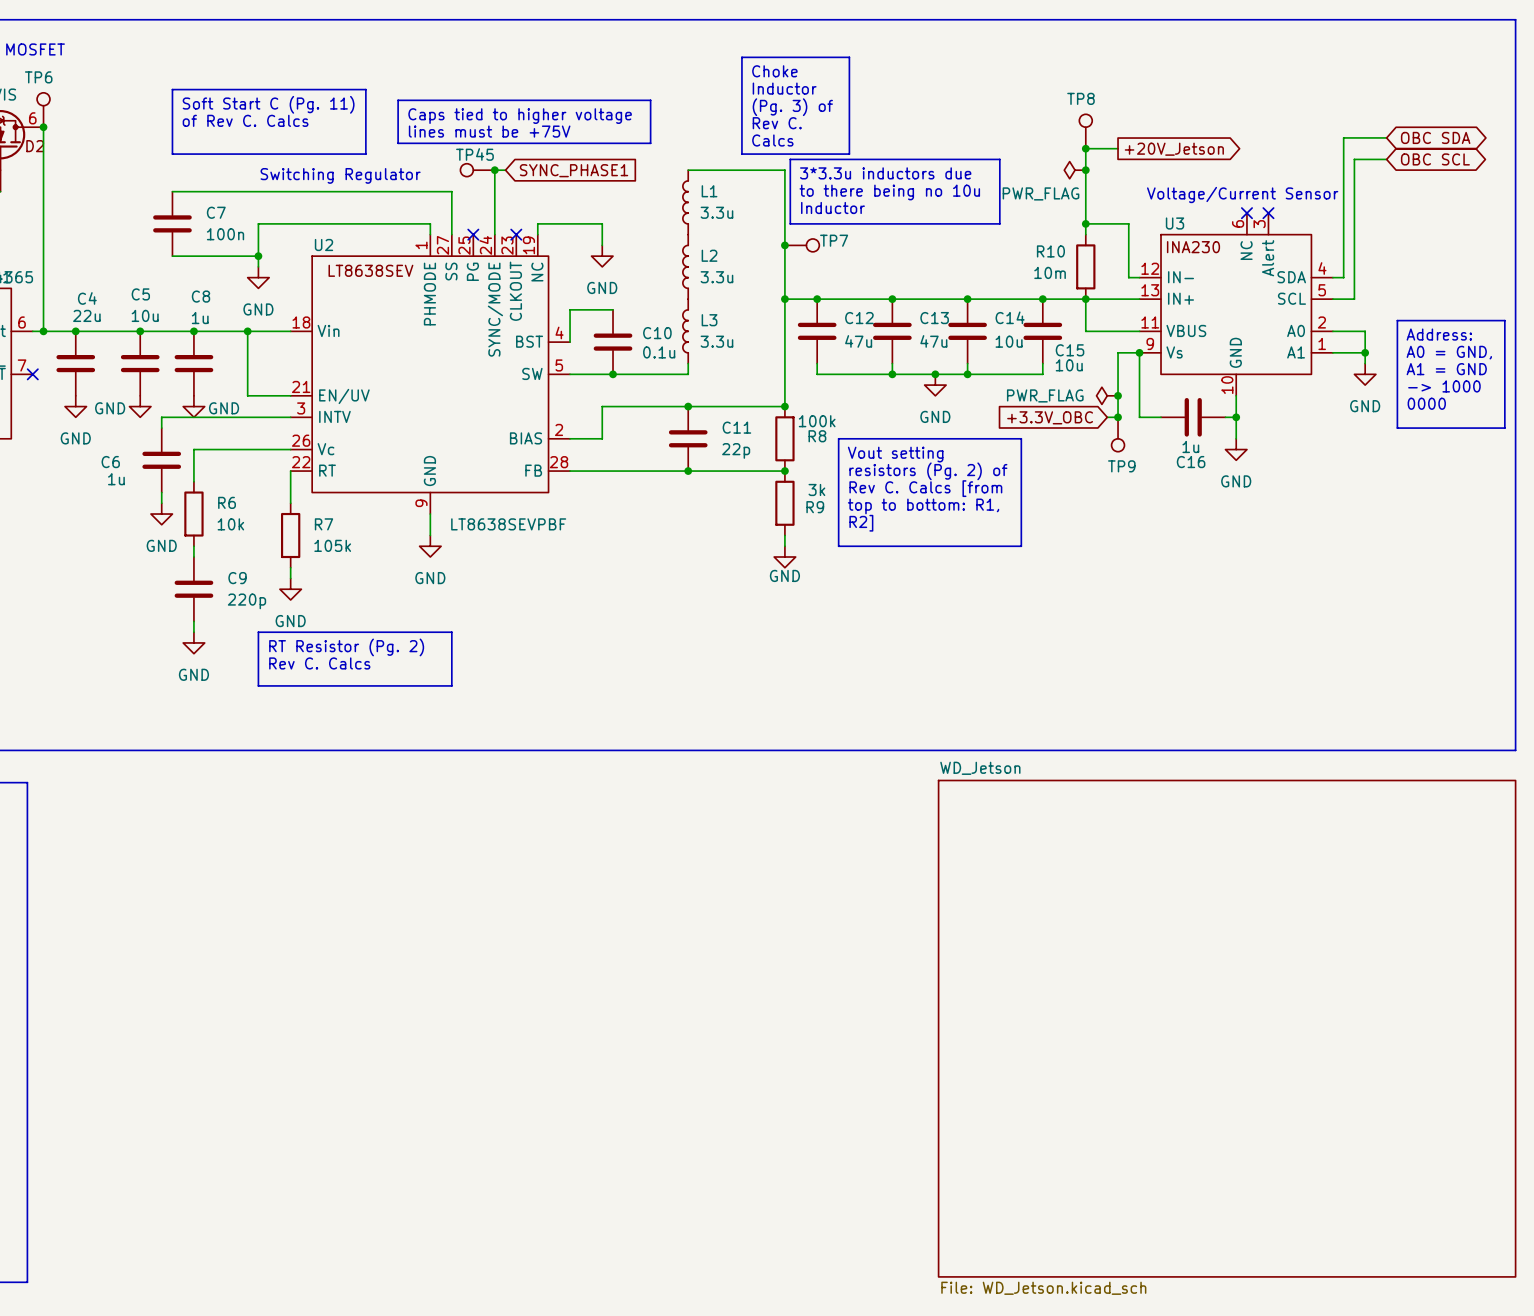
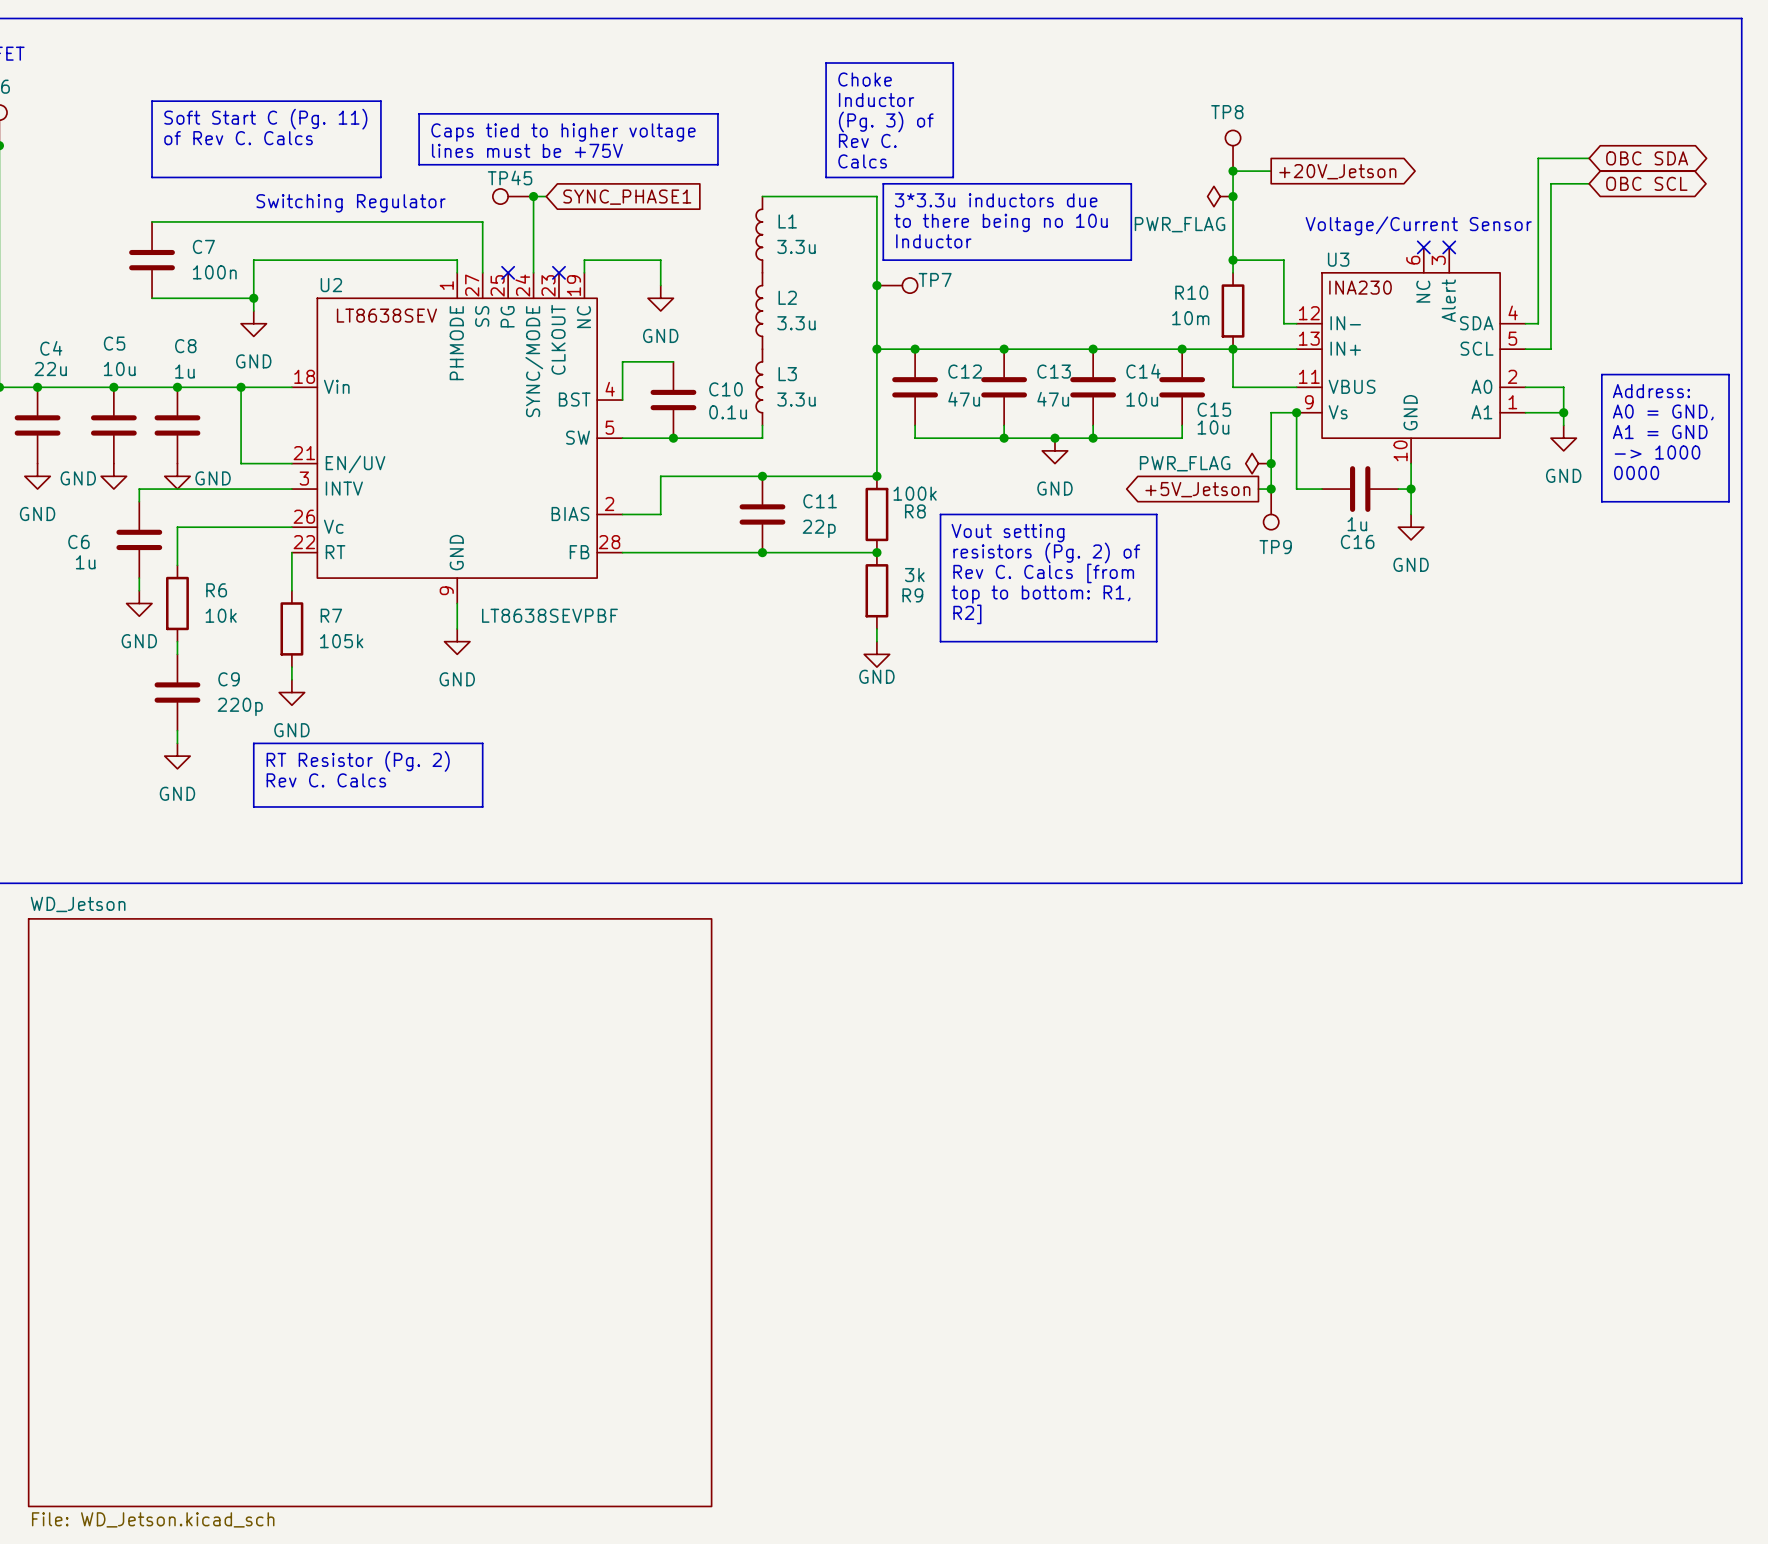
global label shape: input (1050, 417) -> output (1197, 489)
global label: +3.3V_OBC (1050, 417) -> +5V_Jetson (1197, 489)
sheet WD_Jetson: none -> File: WD_Jetson.kicad_sch (370, 1212)
sheet WD_Jetson: File: WD_Jetson.kicad_sch (1227, 1028) -> none

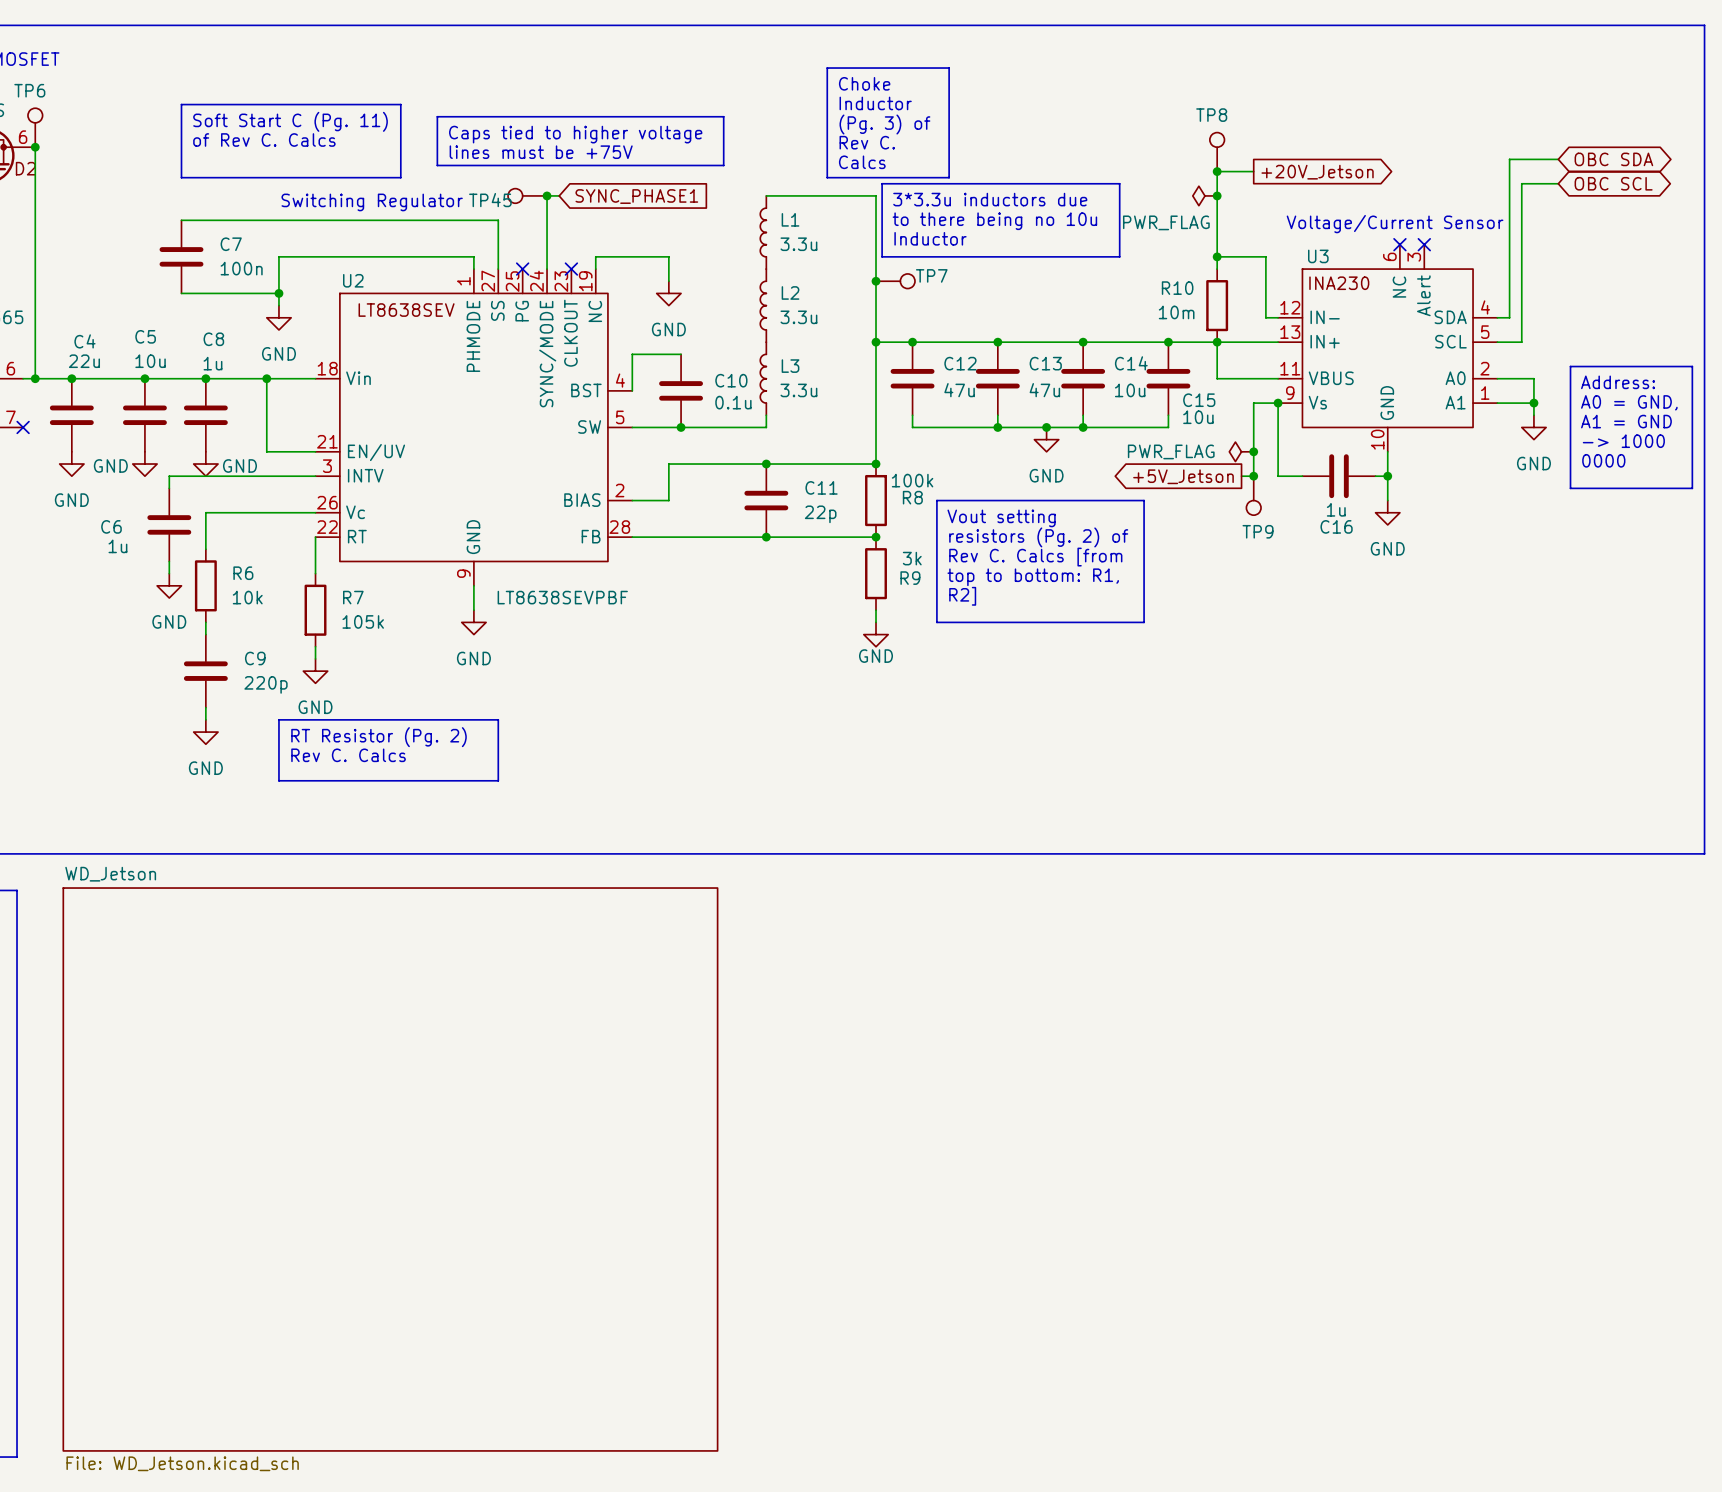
TP45 name position: TP45 (510, 177) -> TP45 (490, 200)

